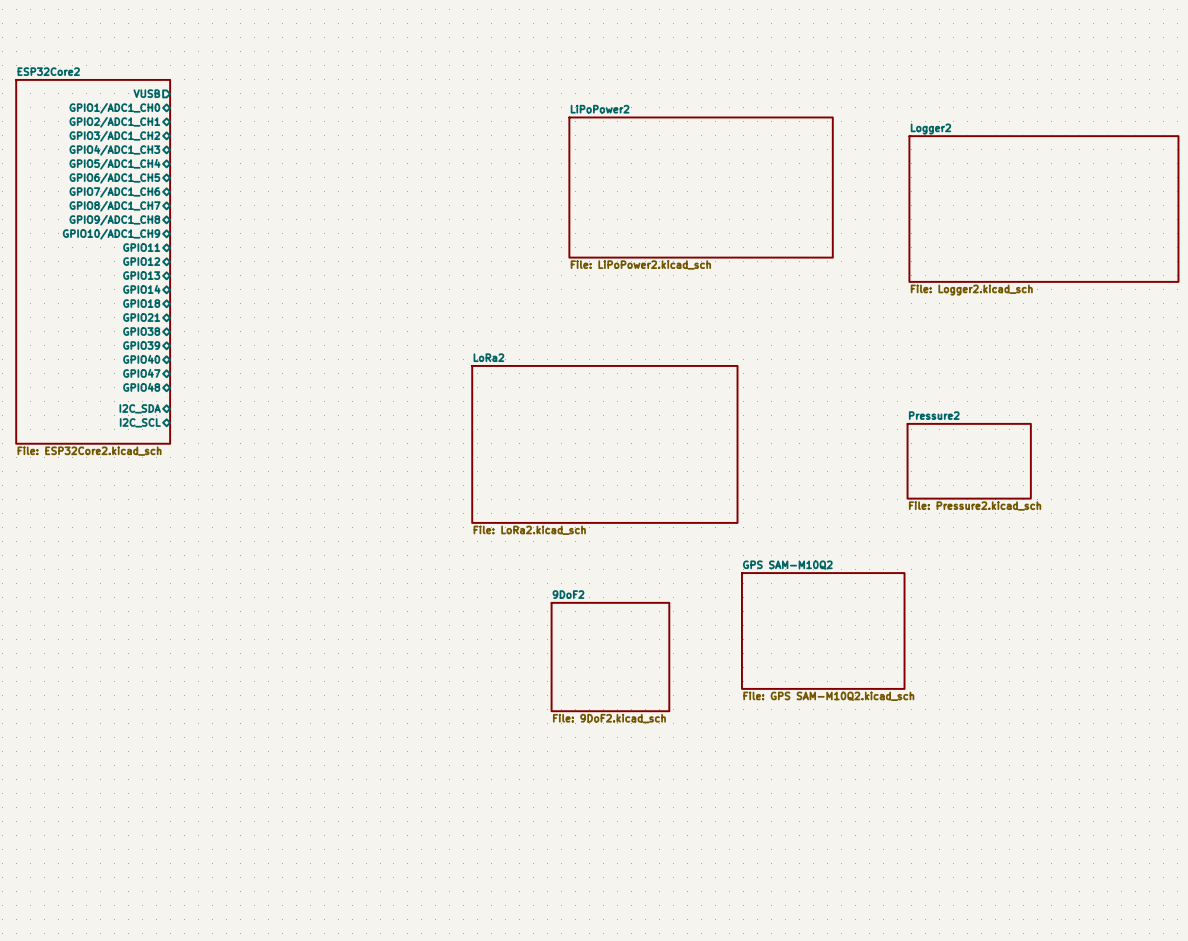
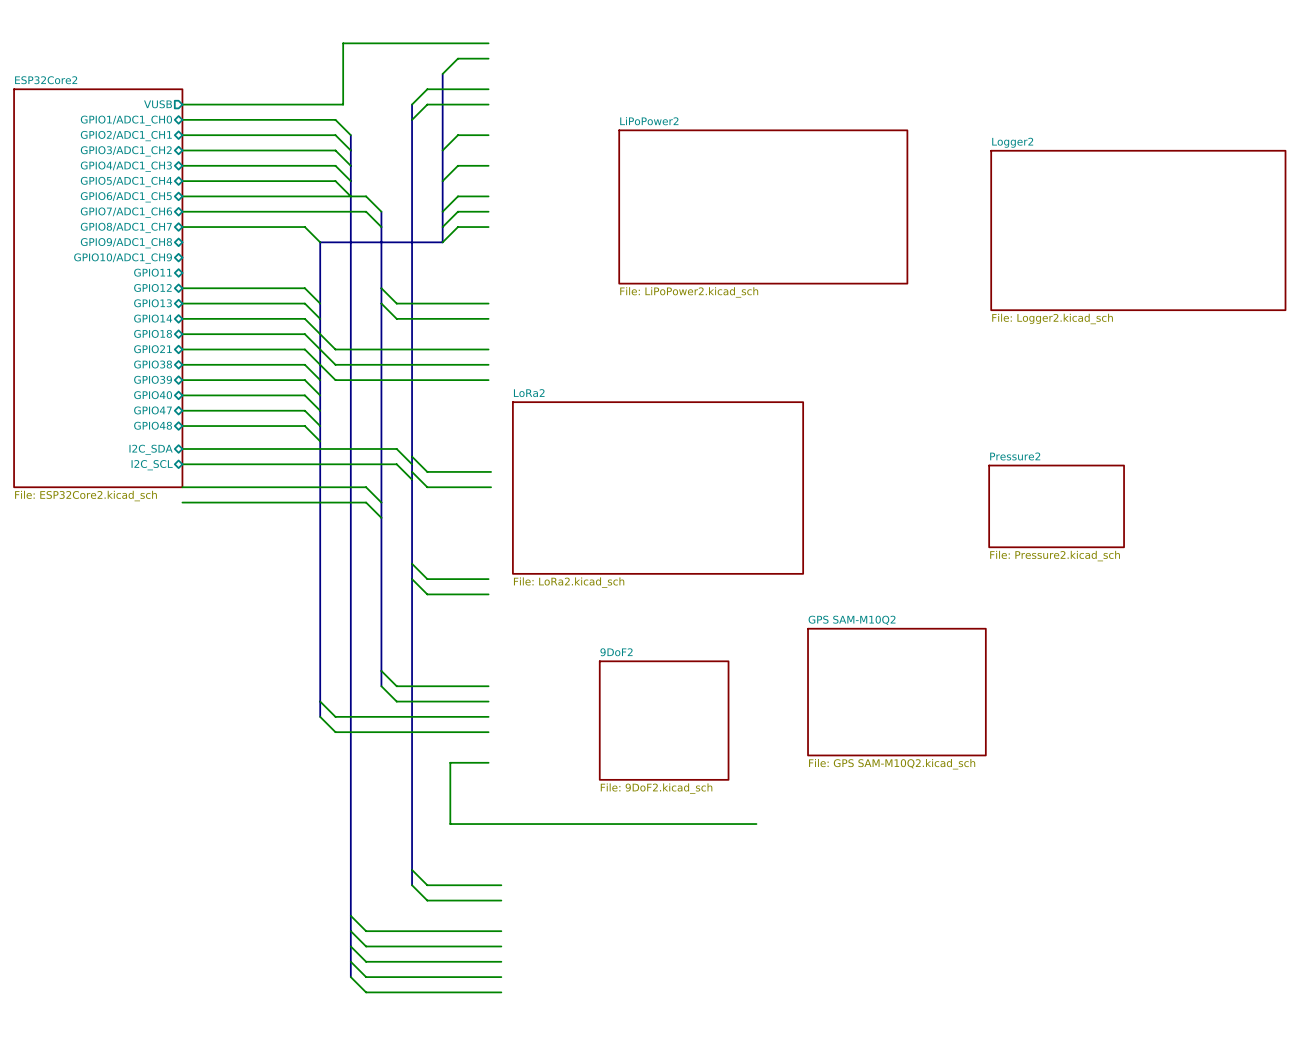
wire: none -> (488, 43) (343, 43) (343, 104) (182, 104)
wire: none -> (488, 58) (457, 58) (442, 73)
bus: none -> (442, 73) (442, 242) (320, 242) (320, 716)
wire: none -> (488, 89) (427, 89) (412, 104)
bus: none -> (412, 104) (412, 885)
wire: none -> (488, 104) (427, 104) (412, 119)
wire: none -> (182, 119) (335, 119) (350, 135)
wire: none -> (182, 135) (335, 135) (350, 150)
bus: none -> (350, 135) (350, 977)
wire: none -> (488, 135) (457, 135) (442, 150)
wire: none -> (182, 150) (335, 150) (350, 165)
wire: none -> (182, 165) (335, 165) (350, 181)
wire: none -> (488, 165) (457, 165) (442, 181)
wire: none -> (182, 181) (335, 181) (350, 196)
wire: none -> (182, 196) (366, 196) (381, 211)
wire: none -> (488, 196) (457, 196) (442, 211)
wire: none -> (182, 211) (366, 211) (381, 227)
bus: none -> (381, 211) (381, 686)
wire: none -> (488, 211) (457, 211) (442, 227)
wire: none -> (182, 227) (304, 227) (320, 242)
wire: none -> (488, 227) (457, 227) (442, 242)
wire: none -> (182, 288) (304, 288) (320, 303)
wire: none -> (381, 288) (396, 303) (488, 303)
wire: none -> (182, 303) (304, 303) (320, 318)
wire: none -> (381, 303) (396, 318) (488, 318)
wire: none -> (182, 318) (304, 318) (335, 349) (488, 349)
wire: none -> (182, 334) (304, 334) (335, 364) (488, 364)
wire: none -> (182, 349) (304, 349) (335, 380) (488, 380)
wire: none -> (182, 364) (304, 364) (320, 380)
wire: none -> (182, 380) (304, 380) (320, 395)
wire: none -> (182, 395) (304, 395) (320, 410)
wire: none -> (182, 410) (304, 410) (320, 426)
wire: none -> (182, 426) (304, 426) (320, 441)
wire: none -> (182, 448) (396, 448) (412, 464)
wire: none -> (412, 456) (427, 471) (491, 471)
wire: none -> (182, 464) (396, 464) (412, 479)
wire: none -> (412, 471) (427, 487) (491, 487)
wire: none -> (182, 487) (366, 487) (381, 502)
wire: none -> (182, 502) (366, 502) (381, 517)
wire: none -> (412, 563) (427, 579) (488, 579)
wire: none -> (412, 579) (427, 594) (488, 594)
wire: none -> (381, 670) (396, 686) (488, 686)
wire: none -> (381, 686) (396, 701) (488, 701)
wire: none -> (320, 701) (335, 716) (488, 716)
wire: none -> (320, 716) (335, 732) (488, 732)
wire: none -> (488, 762) (450, 762) (450, 824) (756, 824)
wire: none -> (412, 869) (427, 885) (501, 885)
wire: none -> (412, 885) (427, 900) (501, 900)
wire: none -> (350, 915) (366, 931) (501, 931)
wire: none -> (350, 931) (366, 946) (501, 946)
wire: none -> (350, 946) (366, 961) (501, 961)
wire: none -> (350, 961) (366, 977) (501, 977)
wire: none -> (350, 977) (366, 992) (501, 992)

